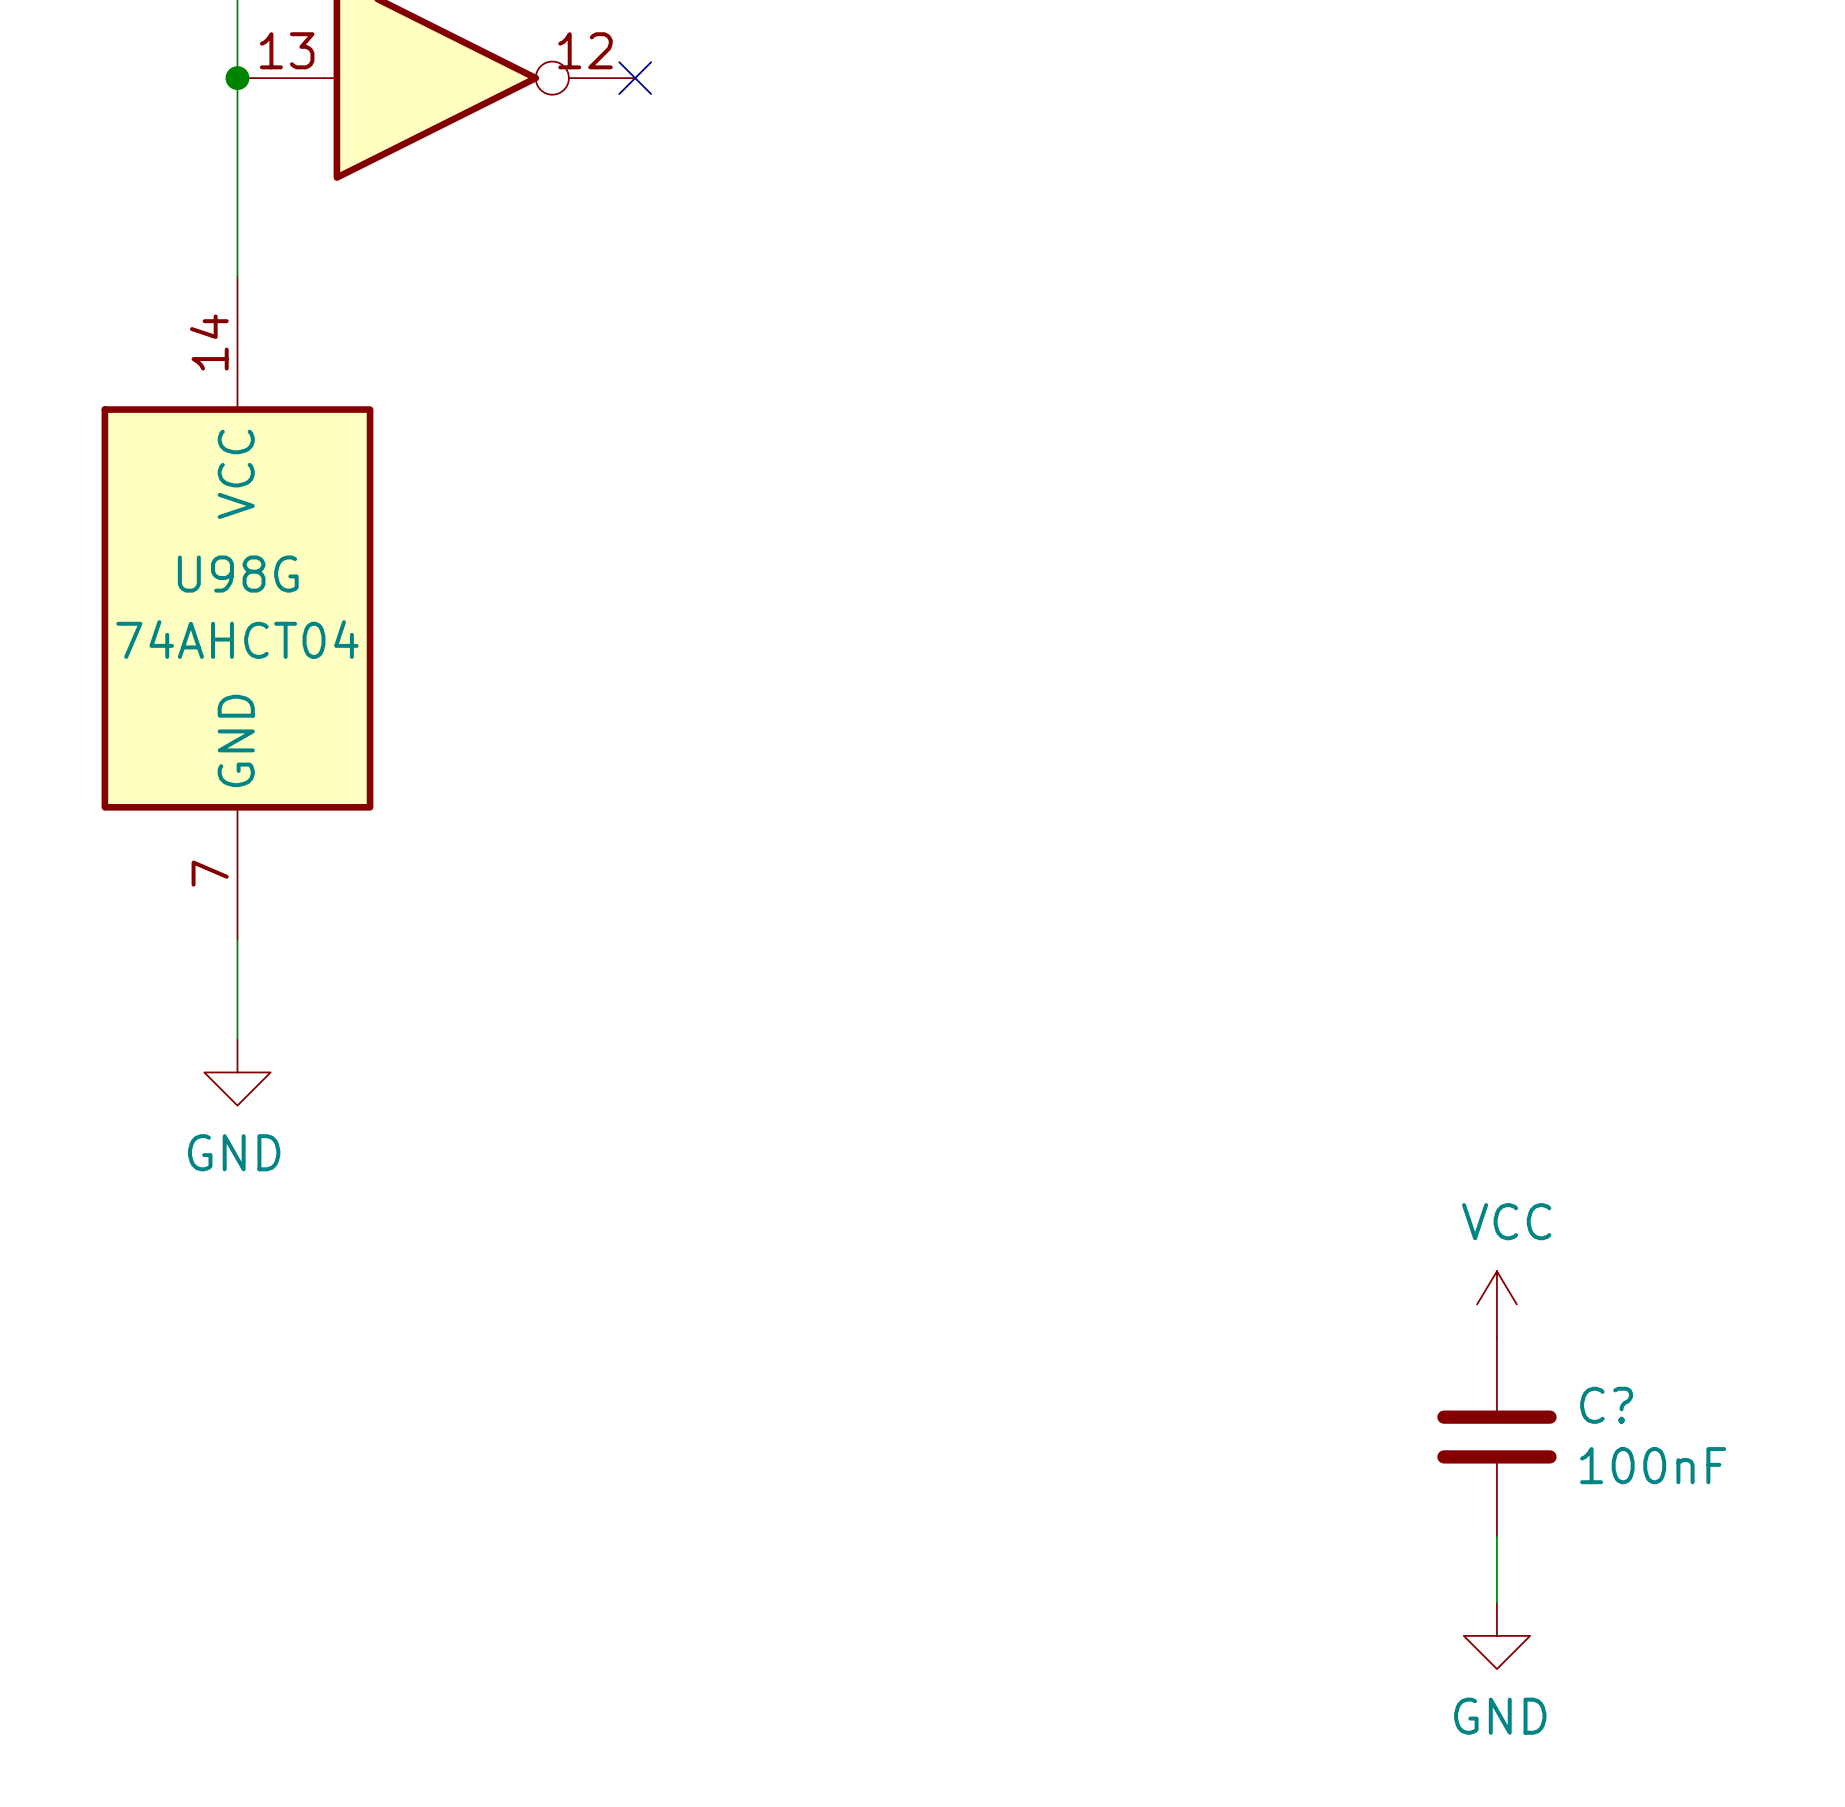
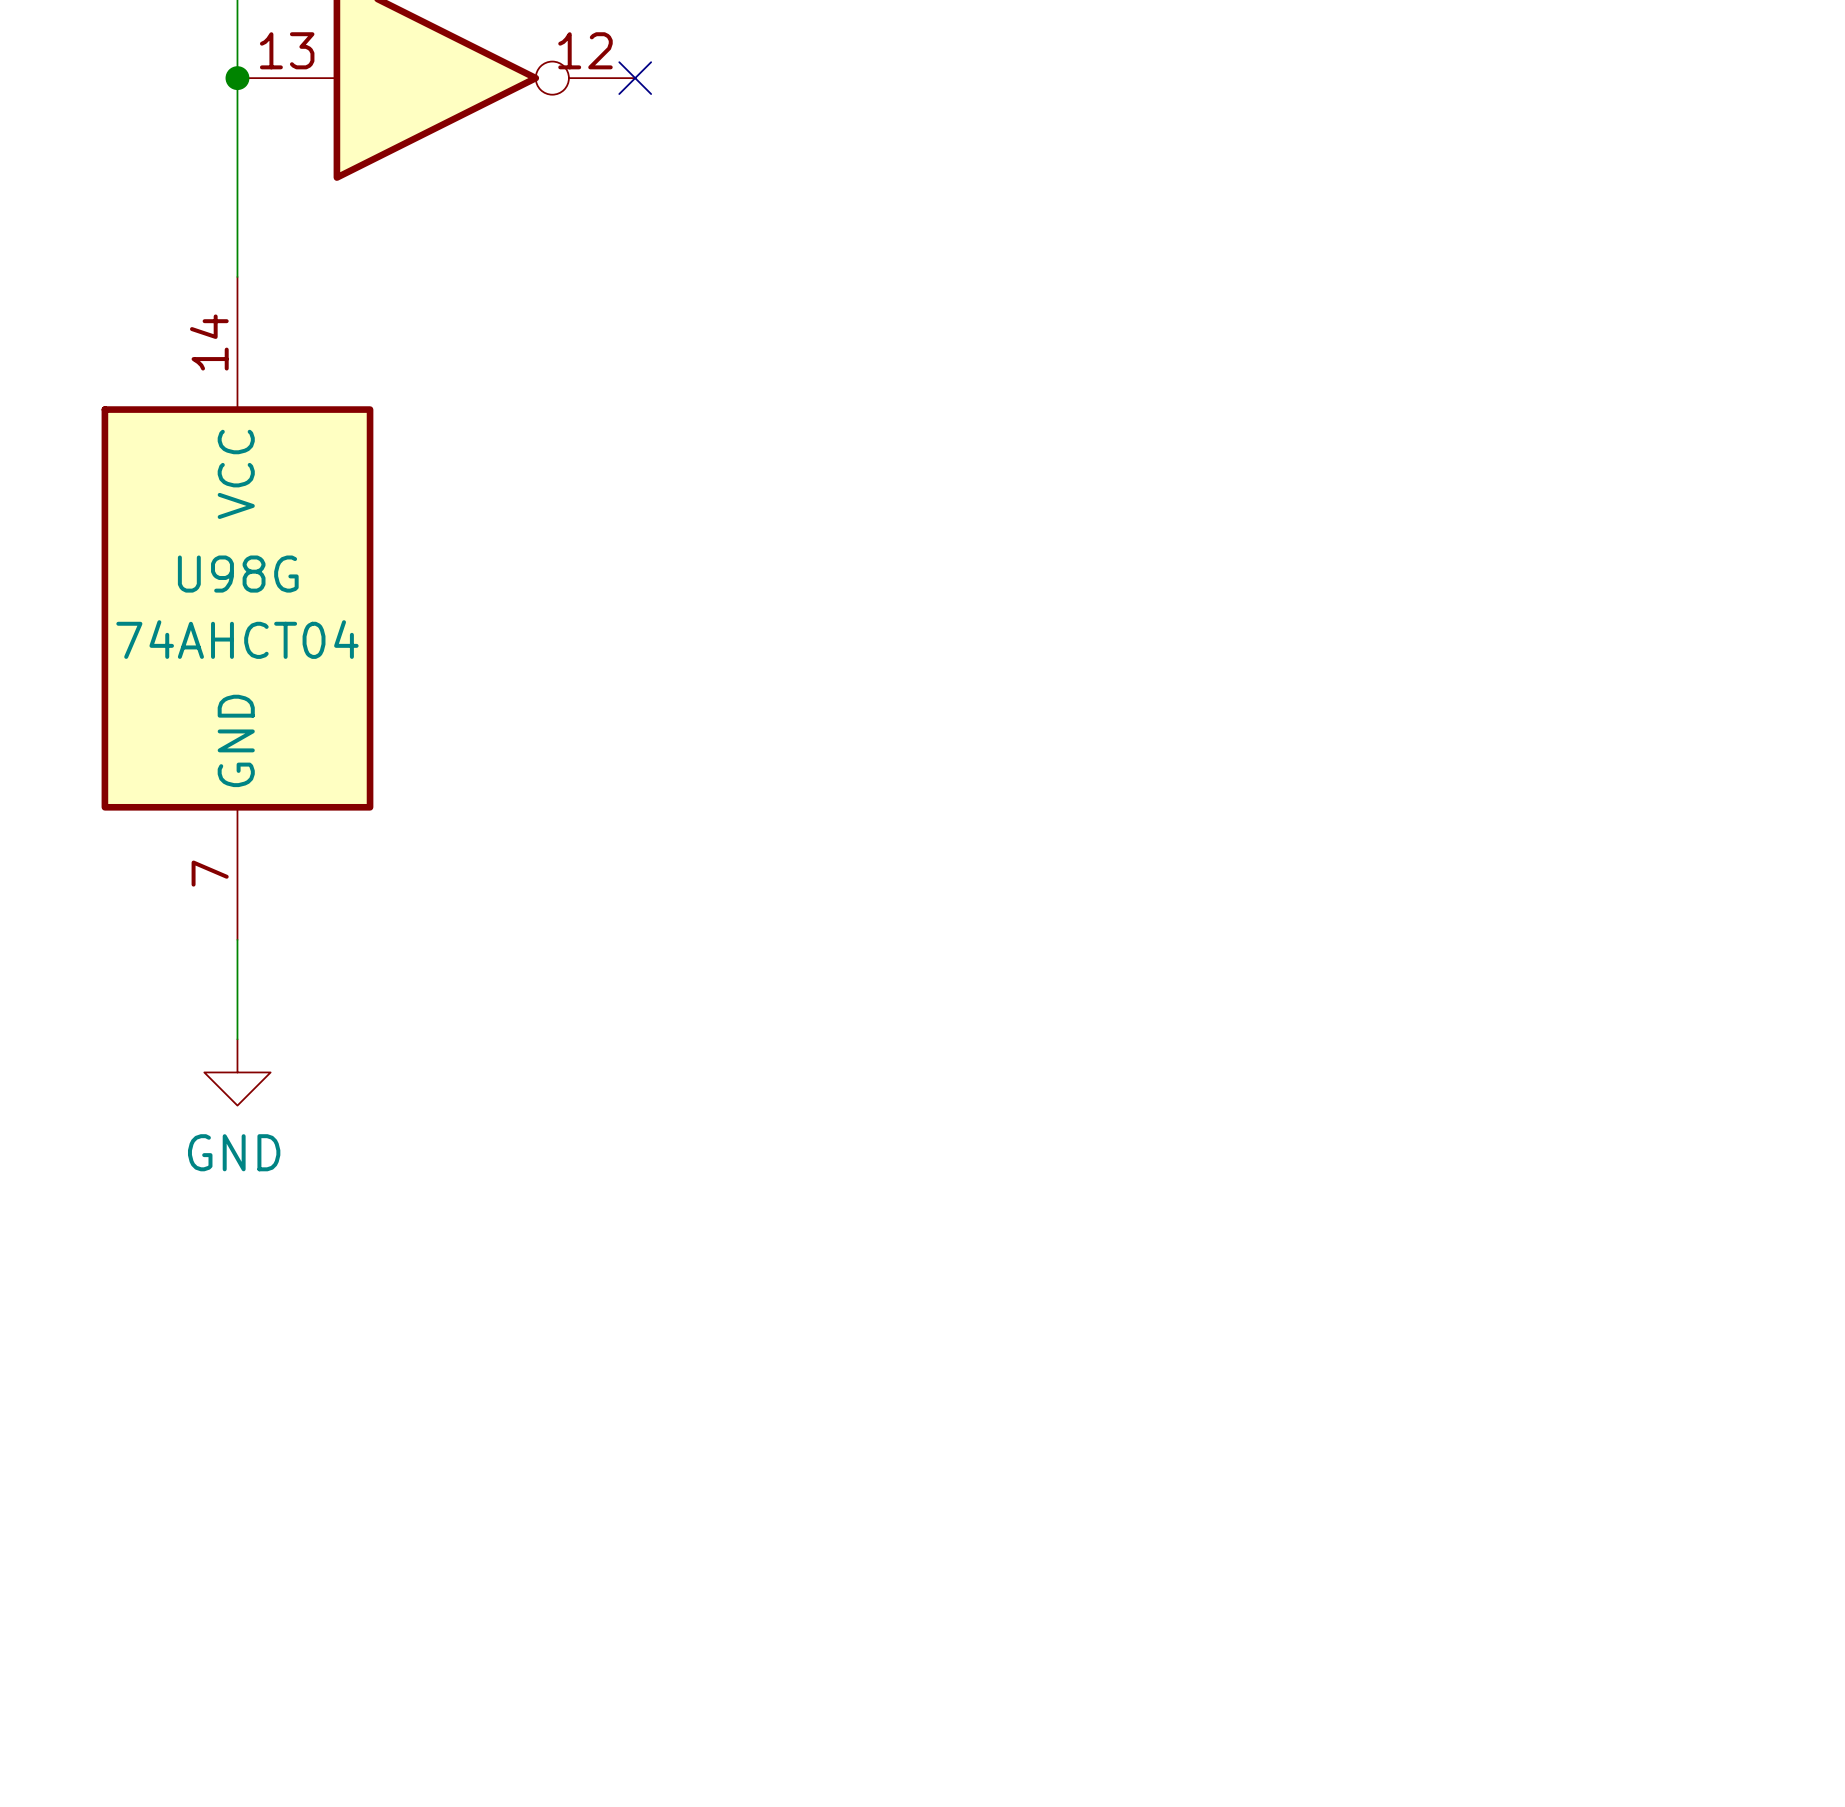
power symbol: VCC (1496, 1304) -> none
C?: 100nF (1496, 1437) -> none
wire: (1496, 1536) (1496, 1602) -> none
power symbol: GND (1496, 1635) -> none

